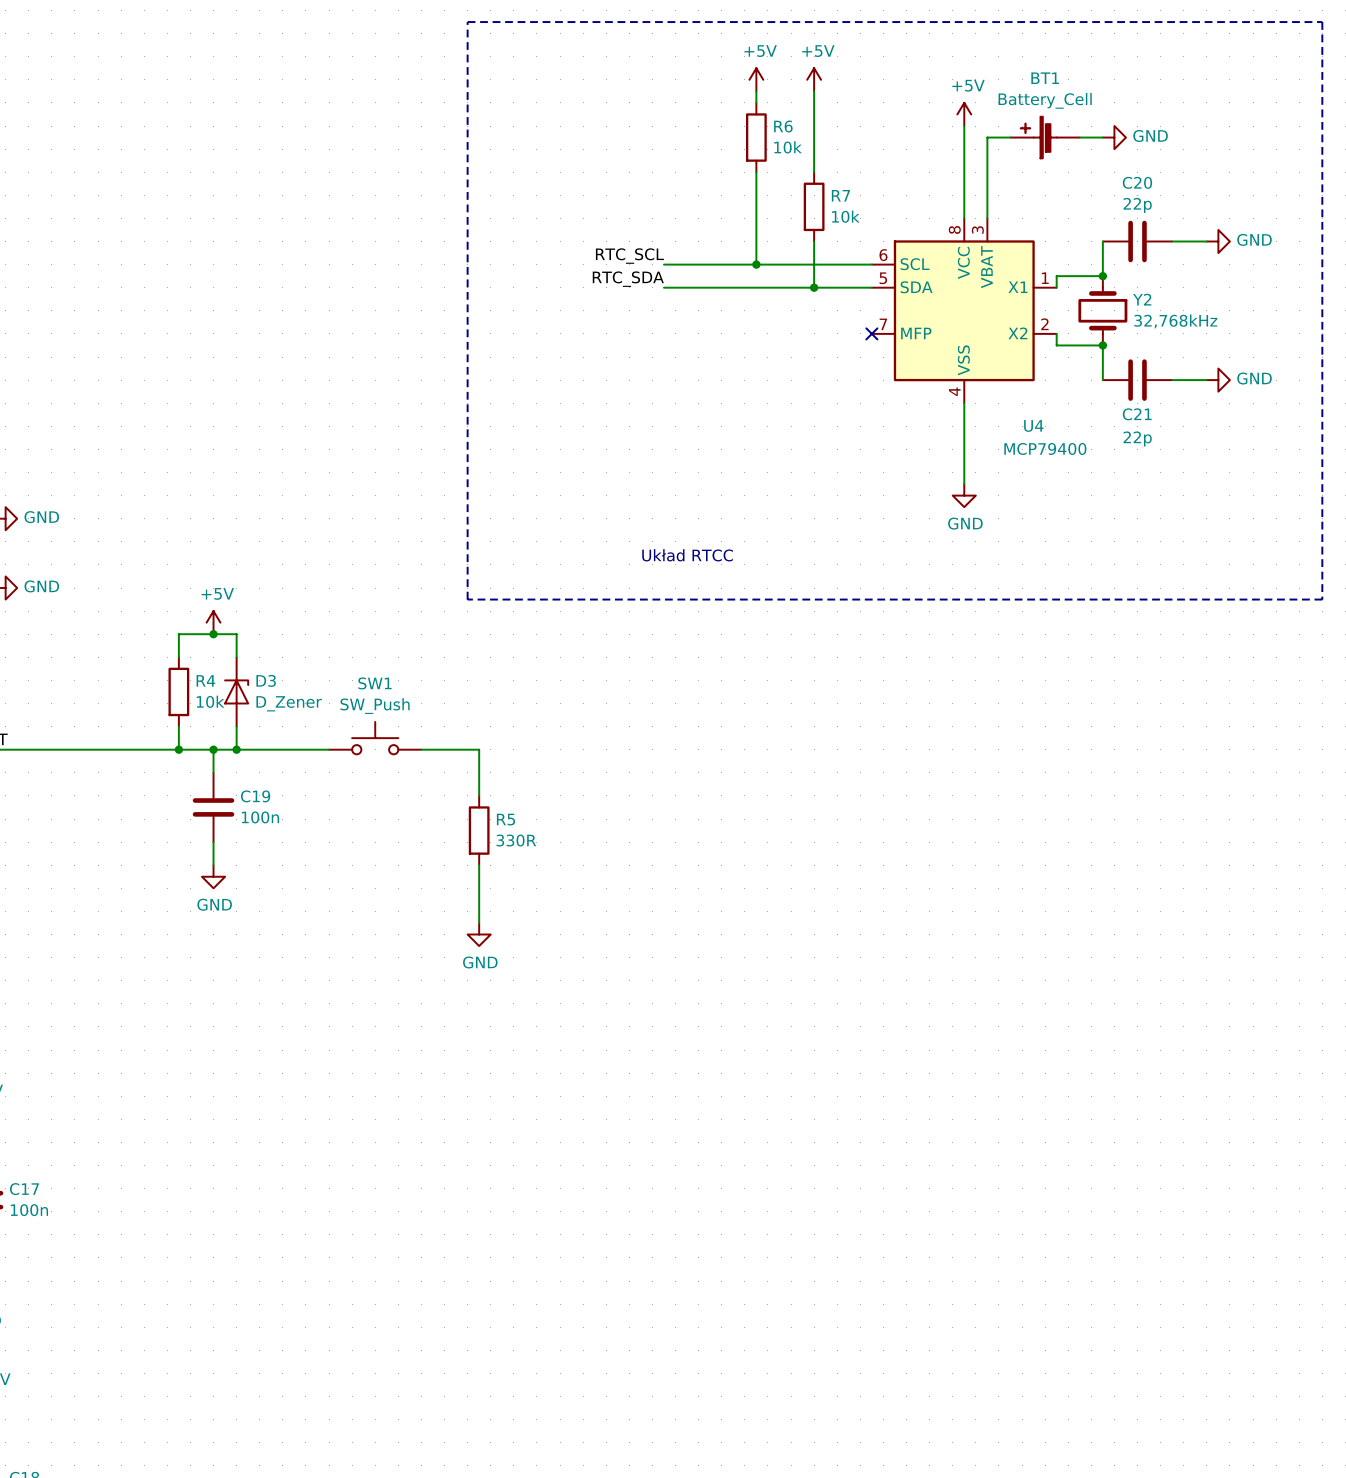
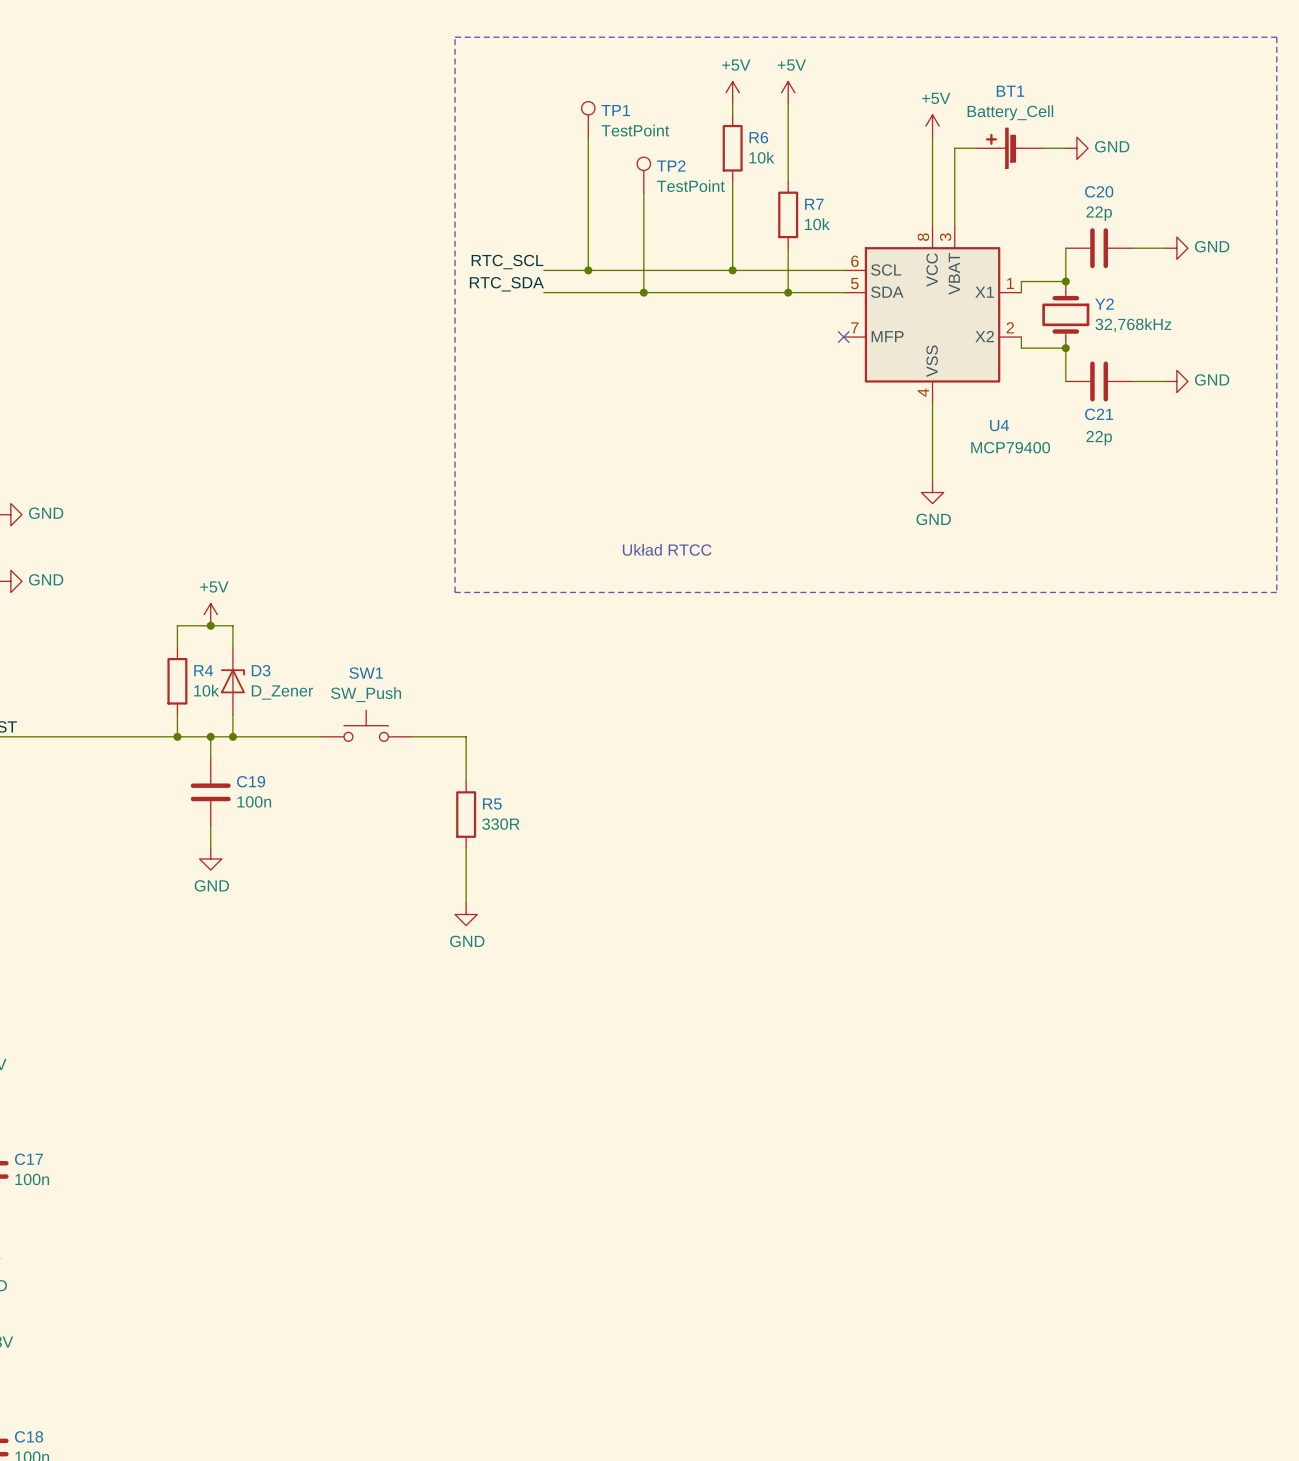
TP1: none -> TestPoint (588, 119)
wire: none -> (588, 137) (588, 270)
TP2: none -> TestPoint (643, 174)
wire: none -> (643, 192) (643, 292) (543, 292)
label position: RTC_SCL (629, 256) -> RTC_SCL (507, 262)
wire: none -> (543, 270) (643, 270)
junction: none -> (588, 270)
label position: RTC_SDA (628, 279) -> RTC_SDA (506, 284)
junction: none -> (643, 292)

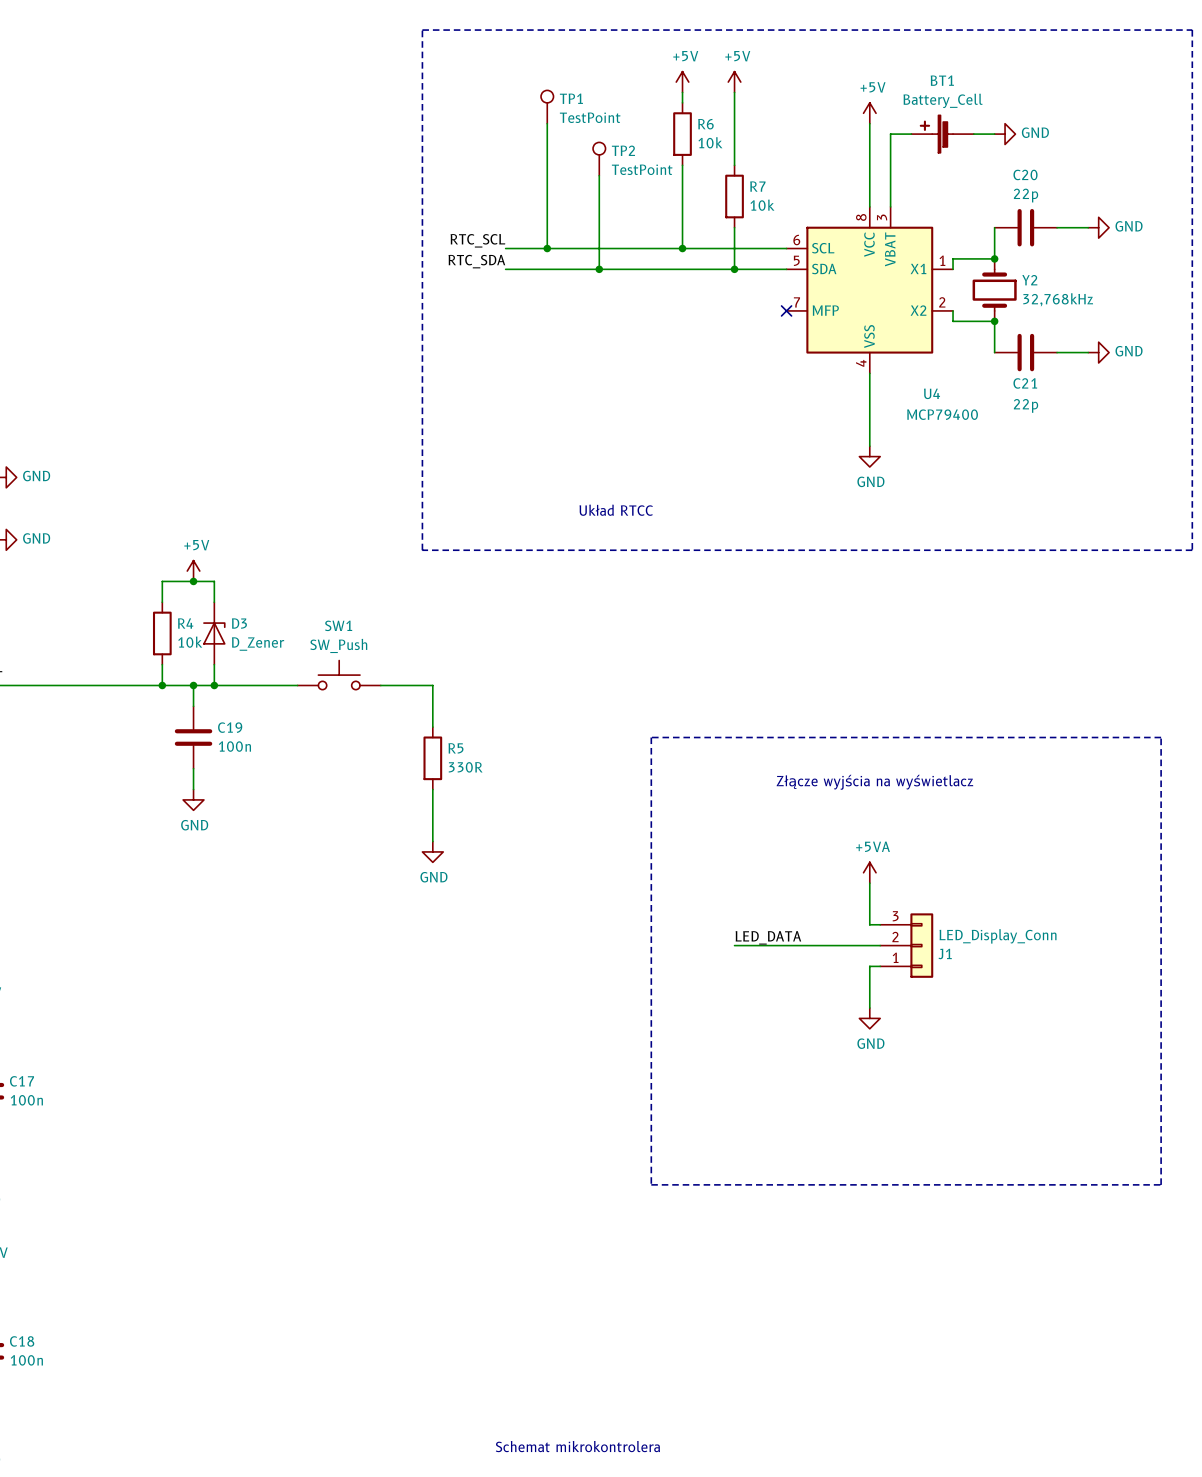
line: none -> (651, 737) (651, 1184) (1161, 1184) (1161, 737) (651, 737)
text: none -> Złącze wyjścia na wyświetlacz (874, 782)
power symbol: none -> +5VA (869, 872)
wire: none -> (869, 883) (869, 924) (880, 924)
label: none -> LED_DATA (768, 937)
wire: none -> (734, 945) (880, 945)
J1: none -> LED_Display_Conn (906, 945)
wire: none -> (880, 966) (869, 966) (869, 1008)
power symbol: none -> GND (869, 1018)

